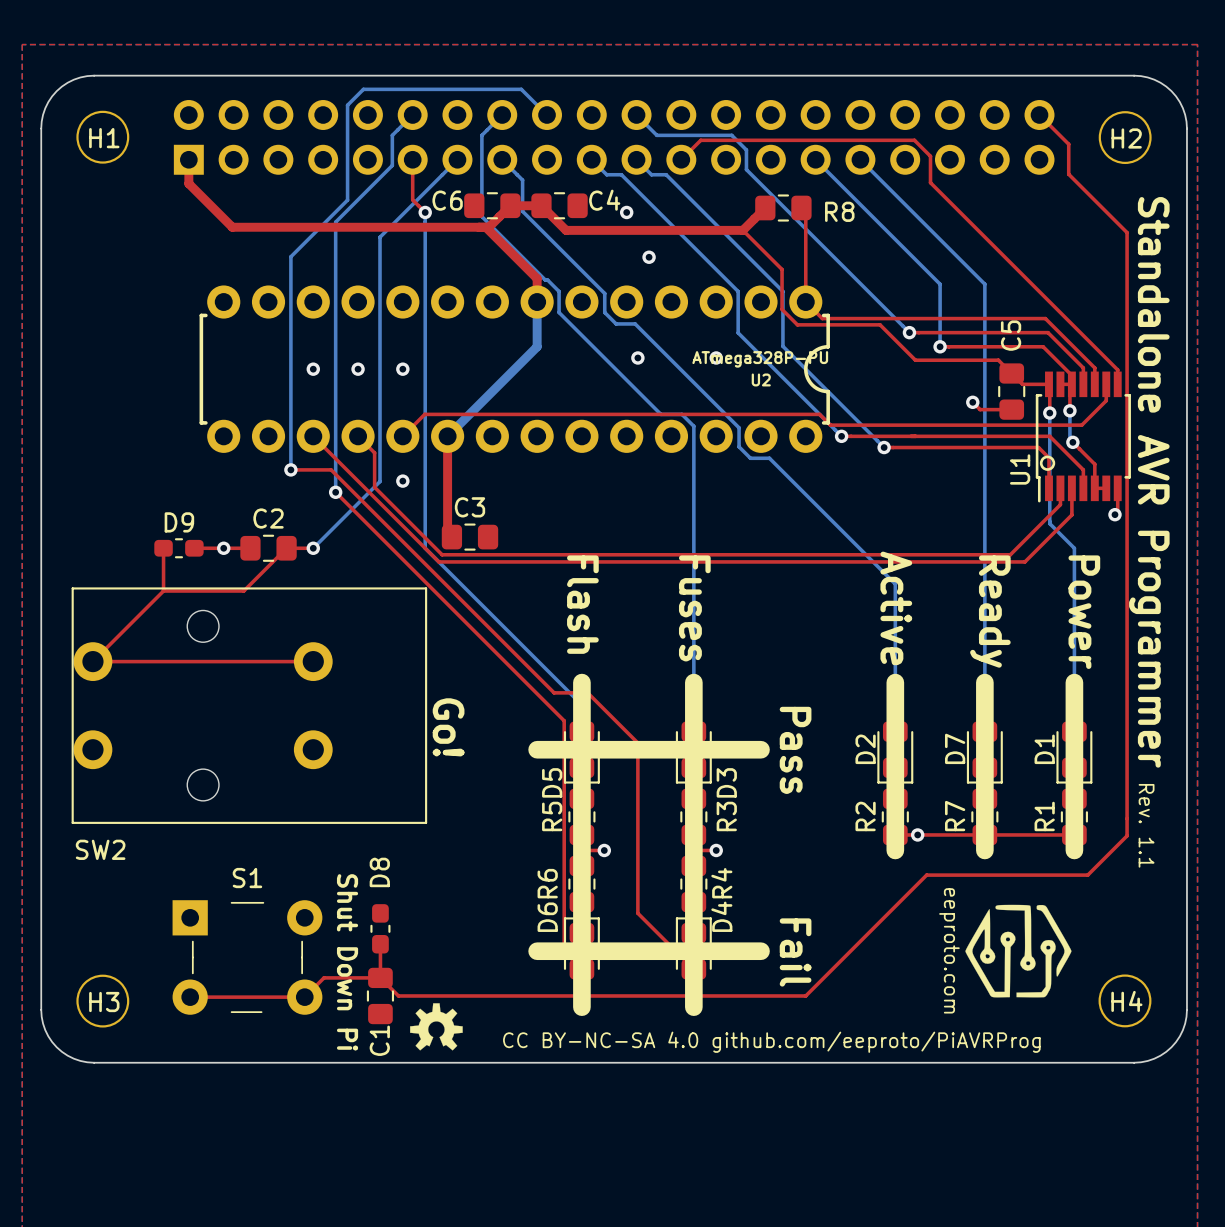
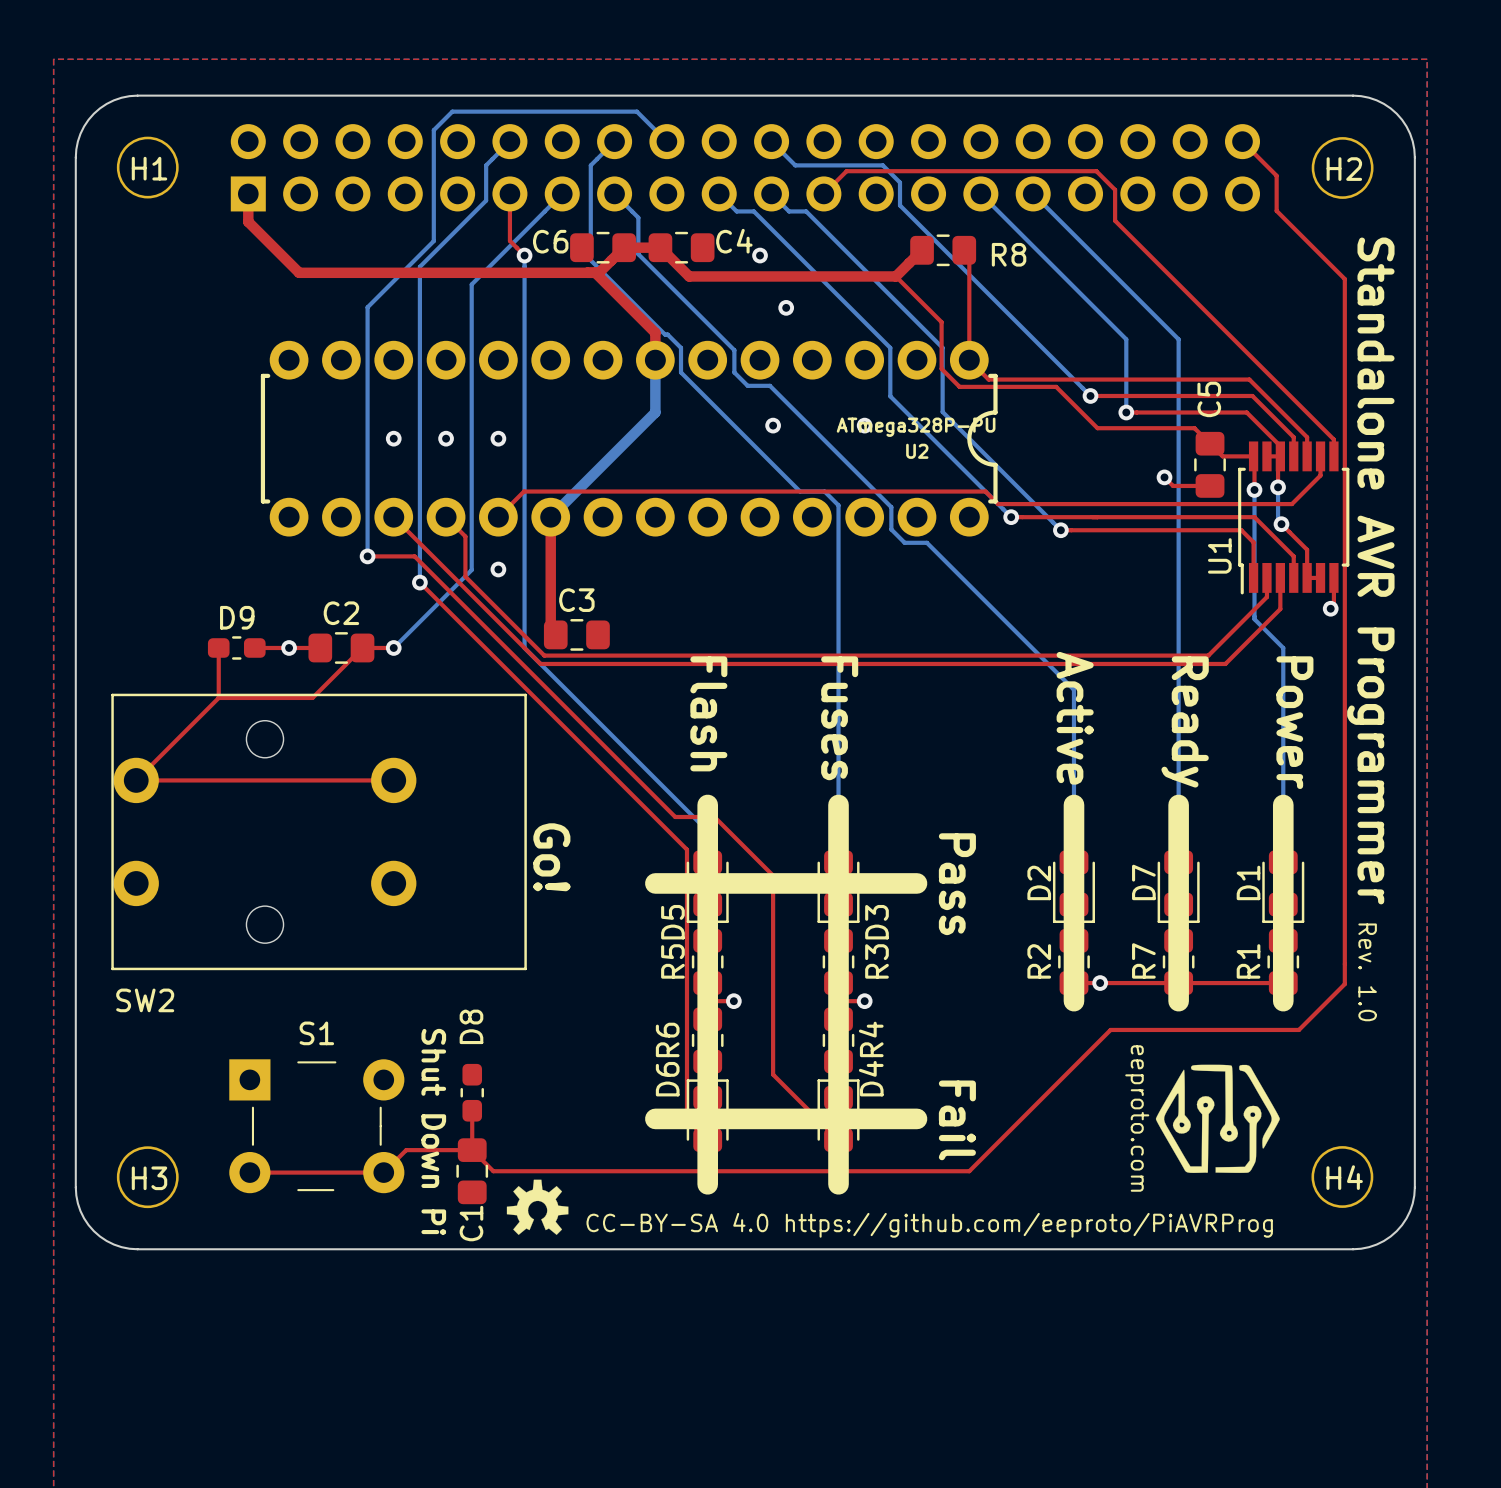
drawing: [1039, 455, 1056, 471] -> none
text: Rev. 1.1 (1146, 825) -> Rev. 1.0 (1367, 972)
text: CC BY-NC-SA 4.0 github.com/eeproto/PiAVRProg (771, 1042) -> CC-BY-SA 4.0 https://github.com/eeproto/PiAVRProg (929, 1225)

